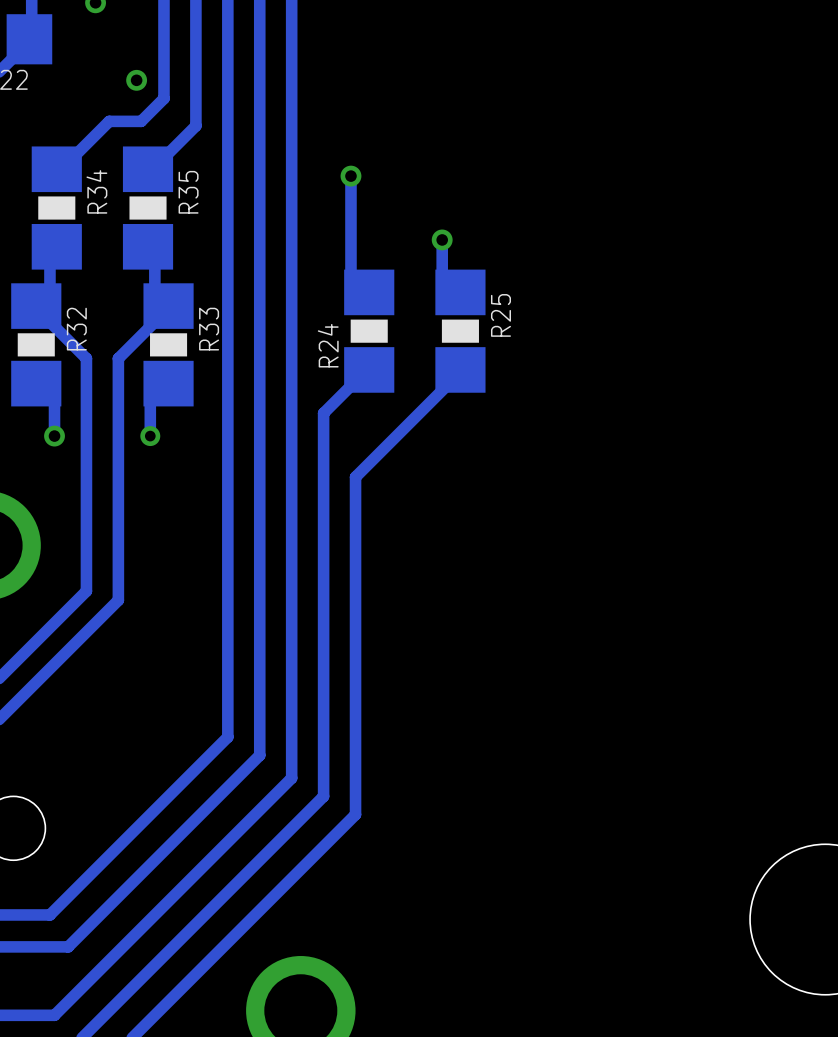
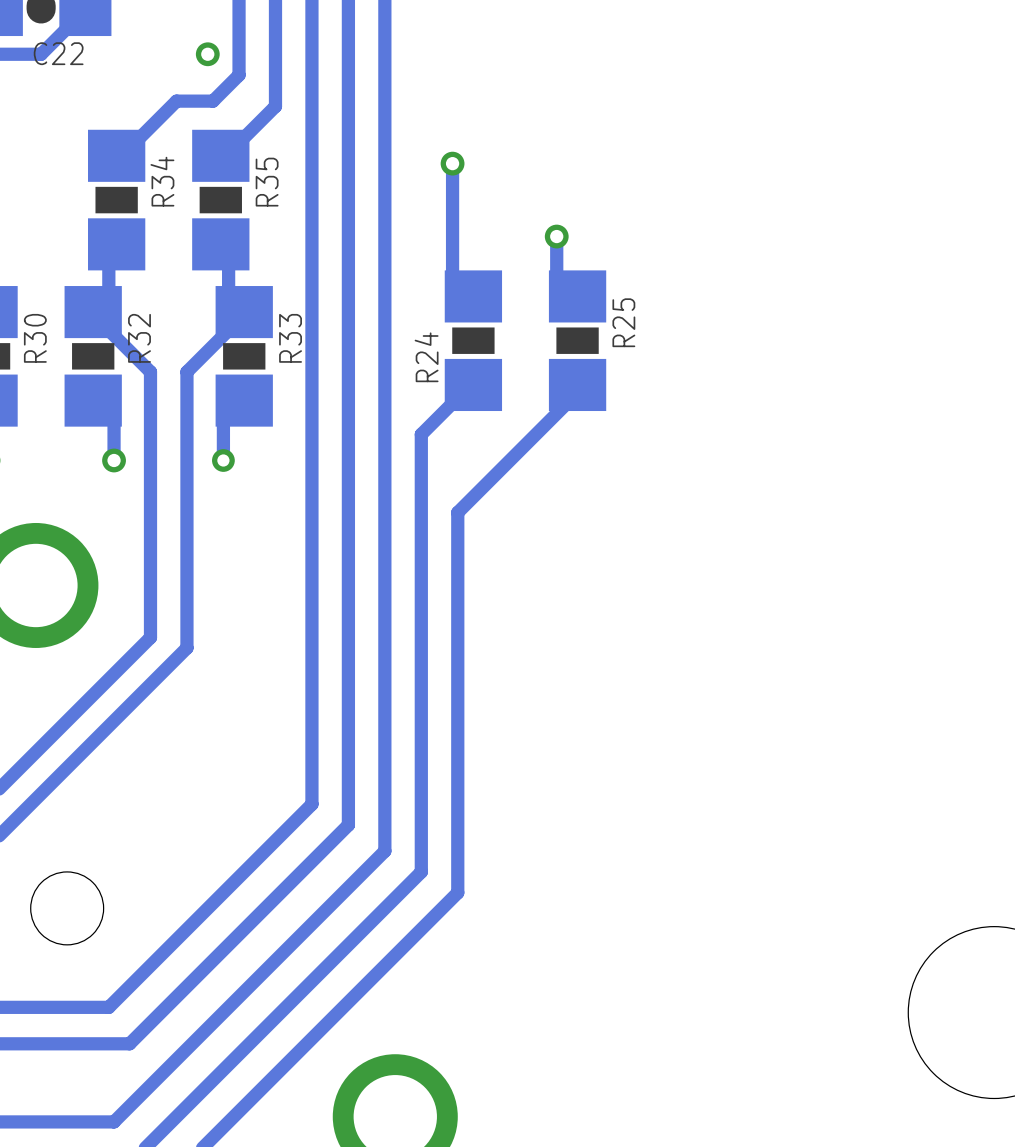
track: (446, 385) (355, 477) (355, 481) -> (577, 392) (457, 512)

